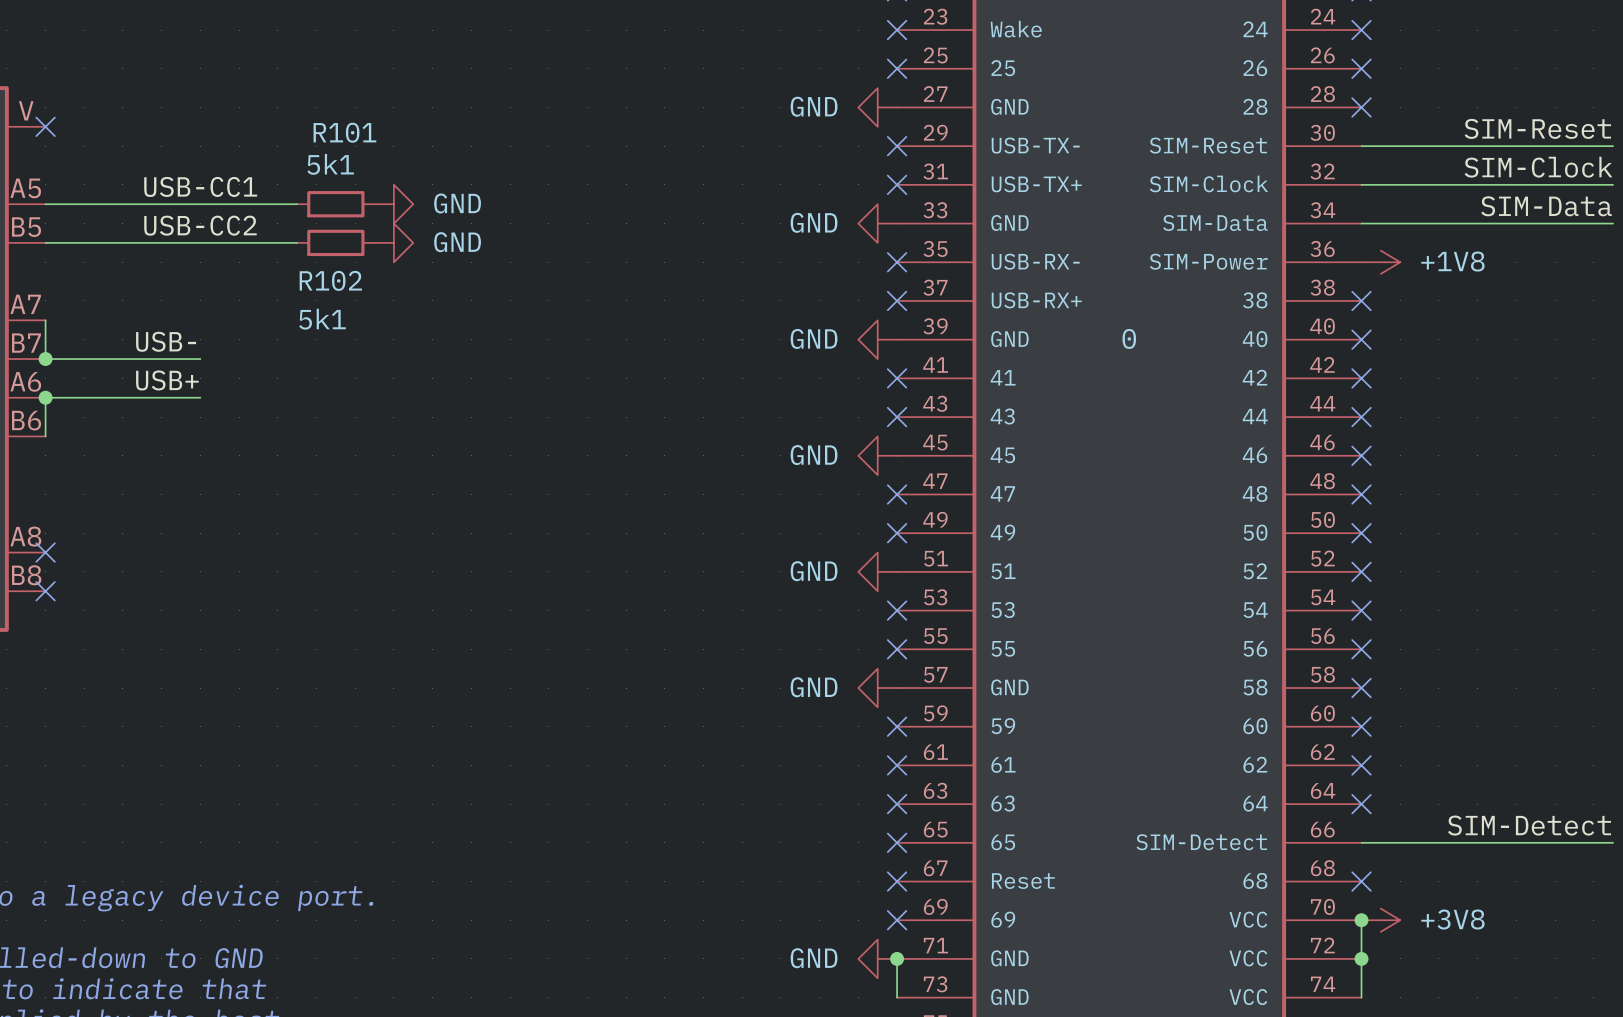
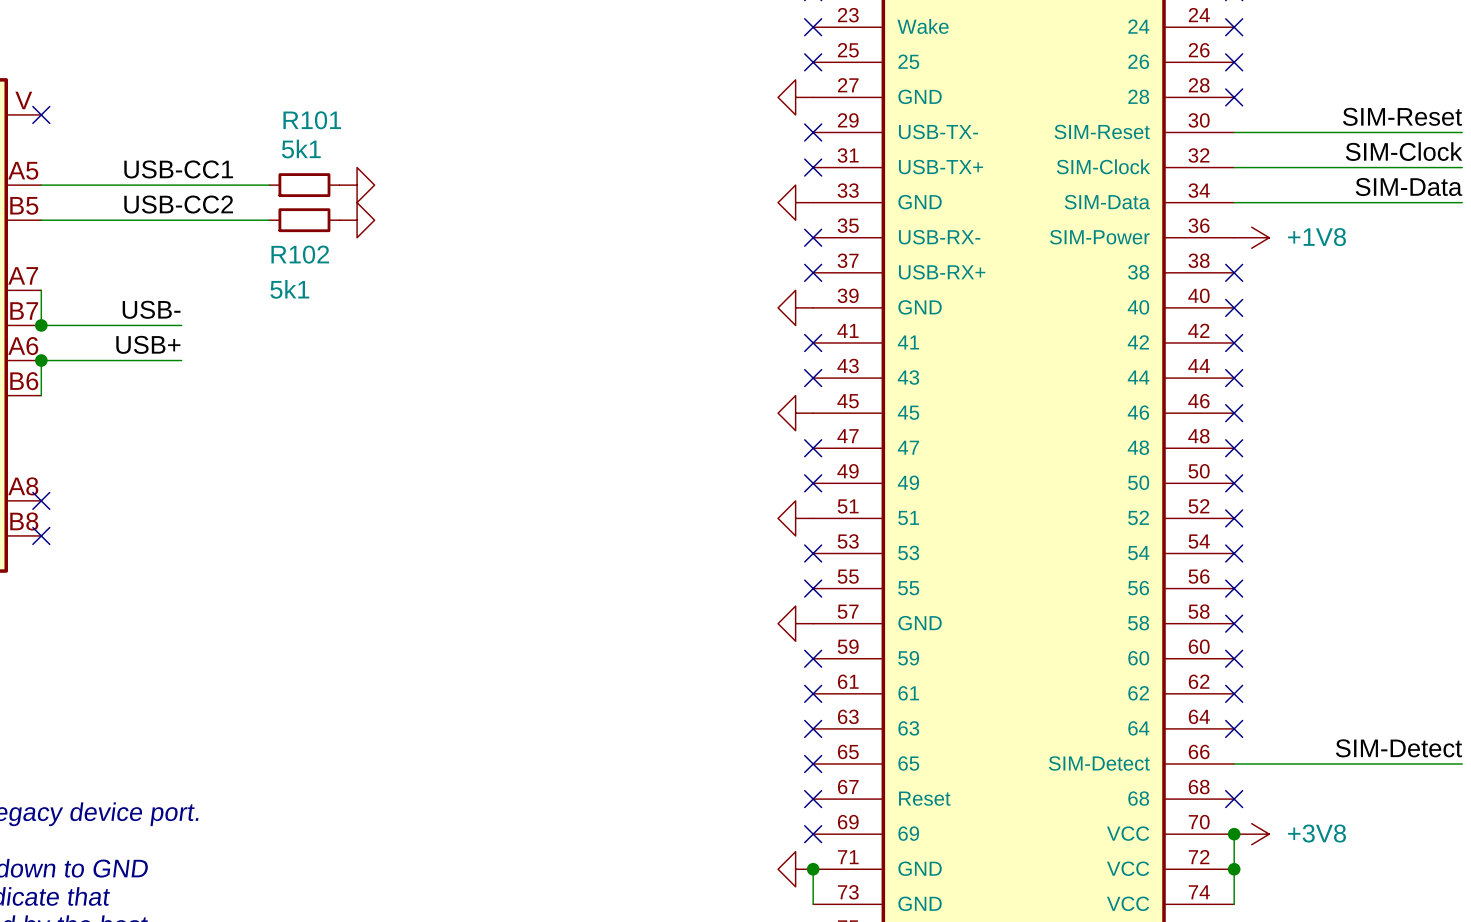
power symbol text: GND (814, 106) -> none
power symbol text: GND (457, 203) -> none
power symbol text: GND (814, 222) -> none
power symbol text: GND (457, 242) -> none
power symbol text: GND (814, 338) -> none
part text: 0 (1129, 338) -> none
power symbol text: GND (814, 455) -> none
power symbol text: GND (814, 571) -> none
power symbol text: GND (814, 687) -> none
power symbol text: GND (814, 958) -> none

